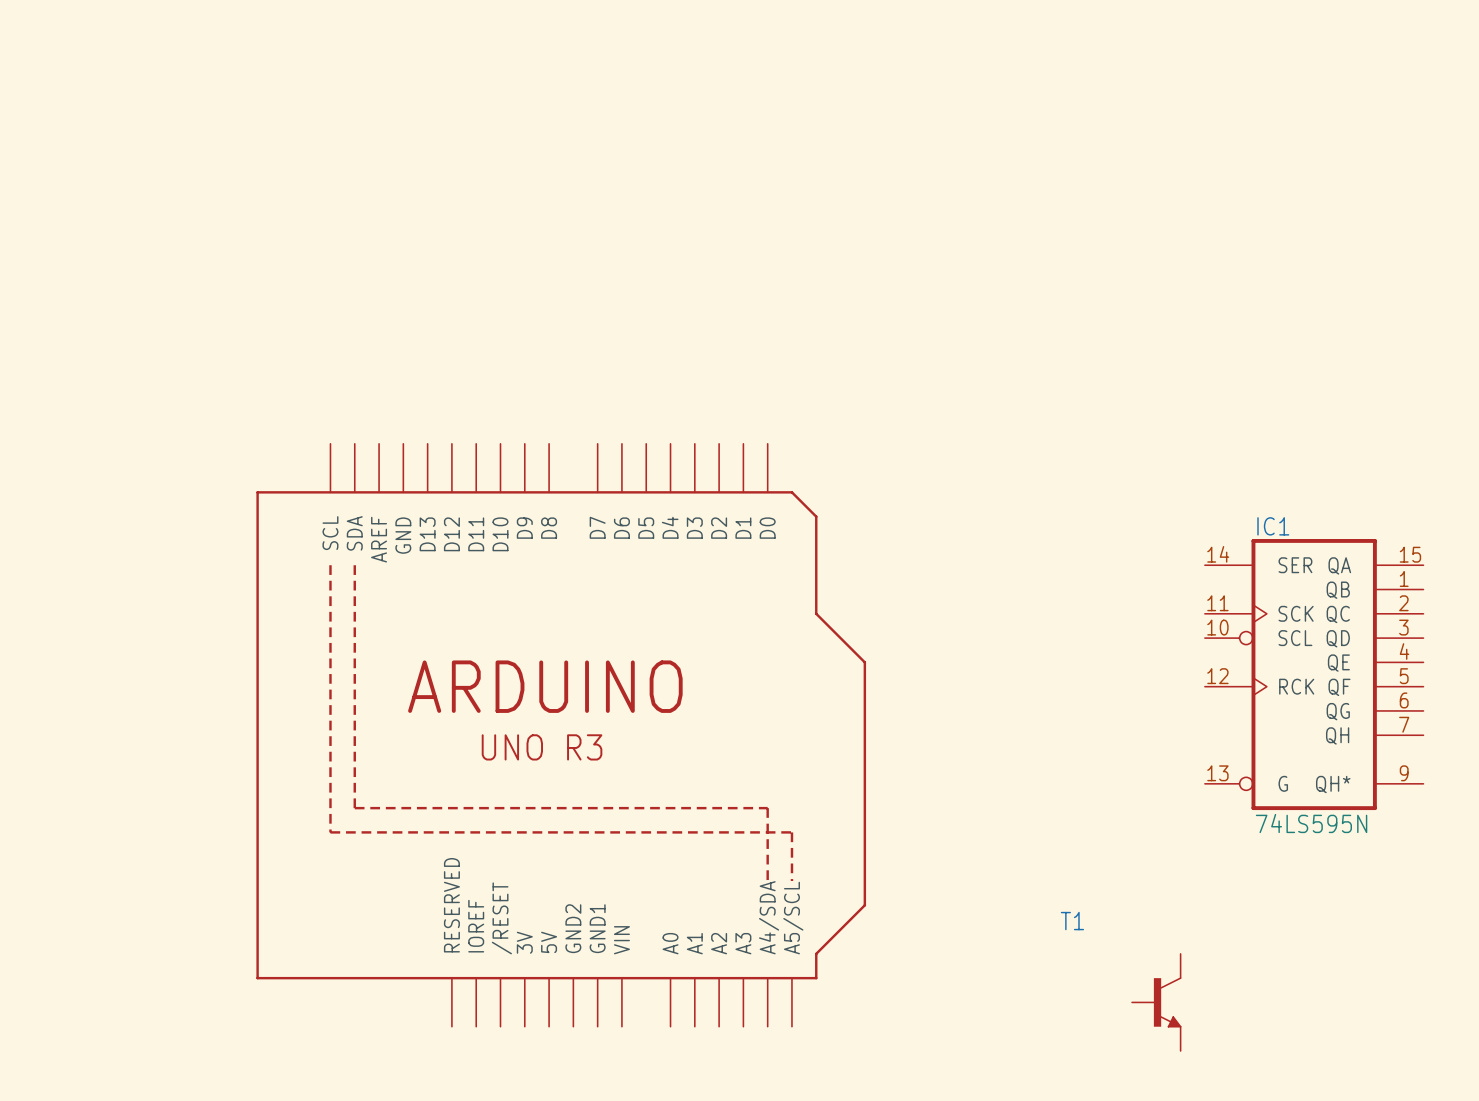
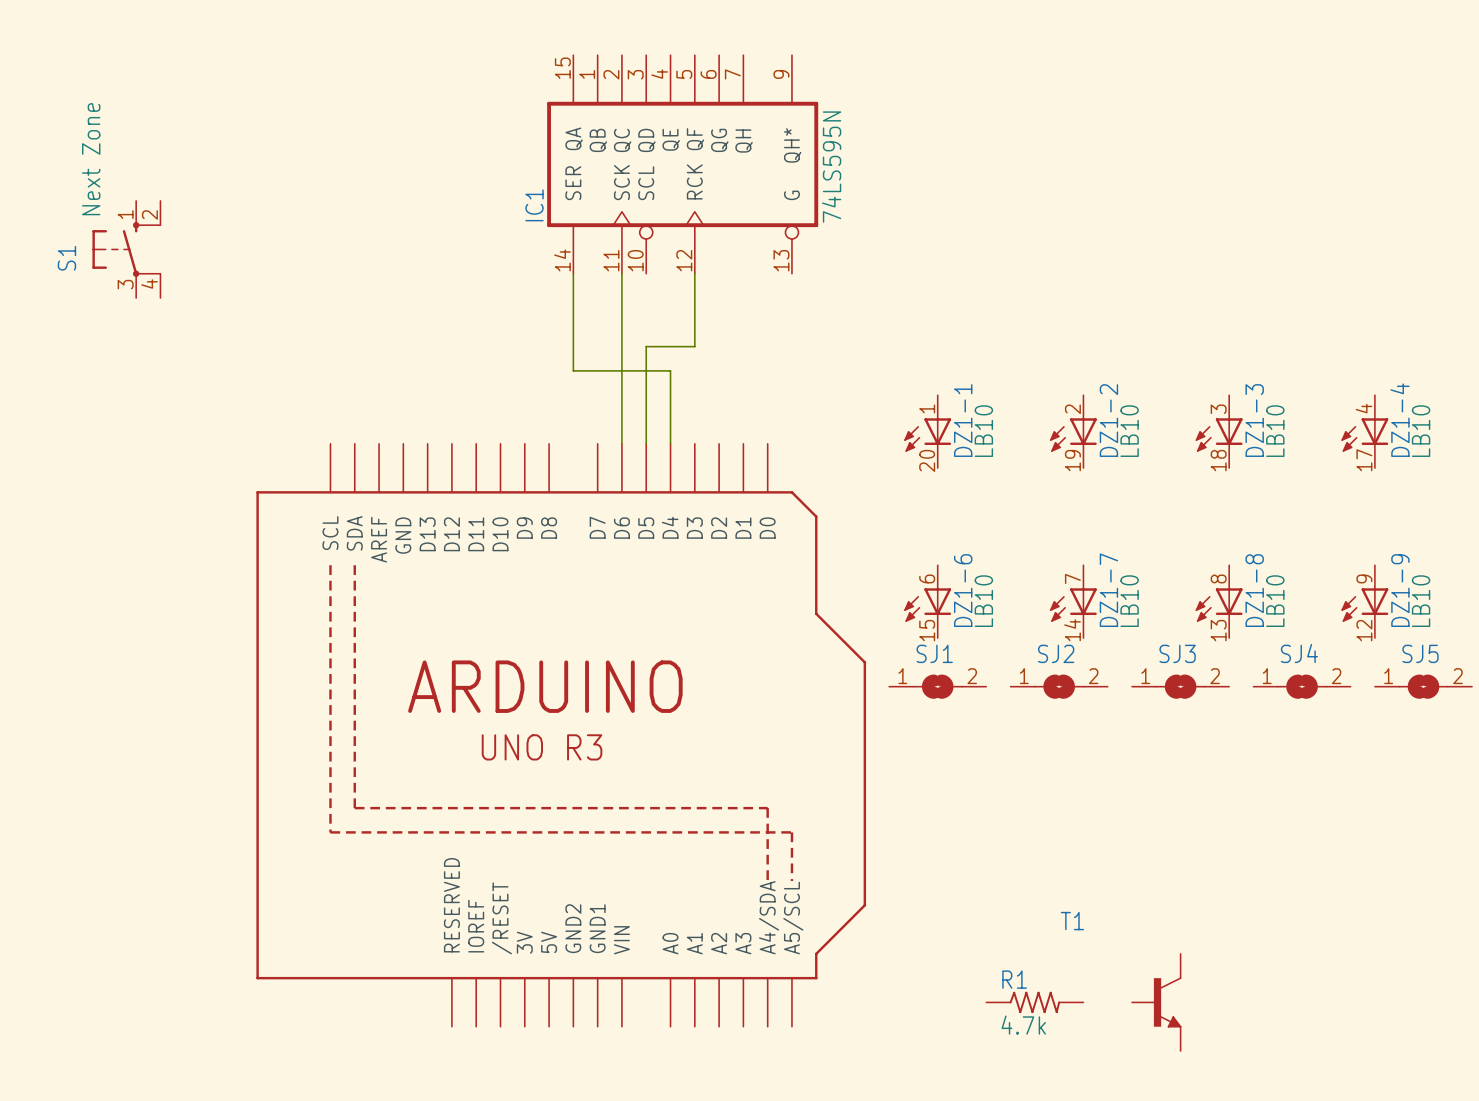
S1: none -> Next Zone (126, 249)
wire: none -> (573, 273) (573, 370) (670, 370) (670, 443)
wire: none -> (621, 273) (621, 443)
wire: none -> (694, 273) (694, 346) (646, 346) (646, 443)
DZ1-1: none -> LB10 (927, 431)
DZ1-2: none -> LB10 (1073, 431)
DZ1-3: none -> LB10 (1219, 431)
DZ1-4: none -> LB10 (1364, 431)
DZ1-6: none -> LB10 (927, 601)
DZ1-7: none -> LB10 (1073, 601)
DZ1-8: none -> LB10 (1219, 601)
DZ1-9: none -> LB10 (1364, 601)
IC1 rotation: 0° (1314, 674) -> 90° counterclockwise (682, 164)
IC1 position: (1314, 674) -> (682, 164)
SJ1: none -> (937, 686)
SJ2: none -> (1059, 686)
SJ3: none -> (1180, 686)
SJ4: none -> (1302, 686)
SJ5: none -> (1423, 686)
R1: none -> 4.7k (1034, 1002)

